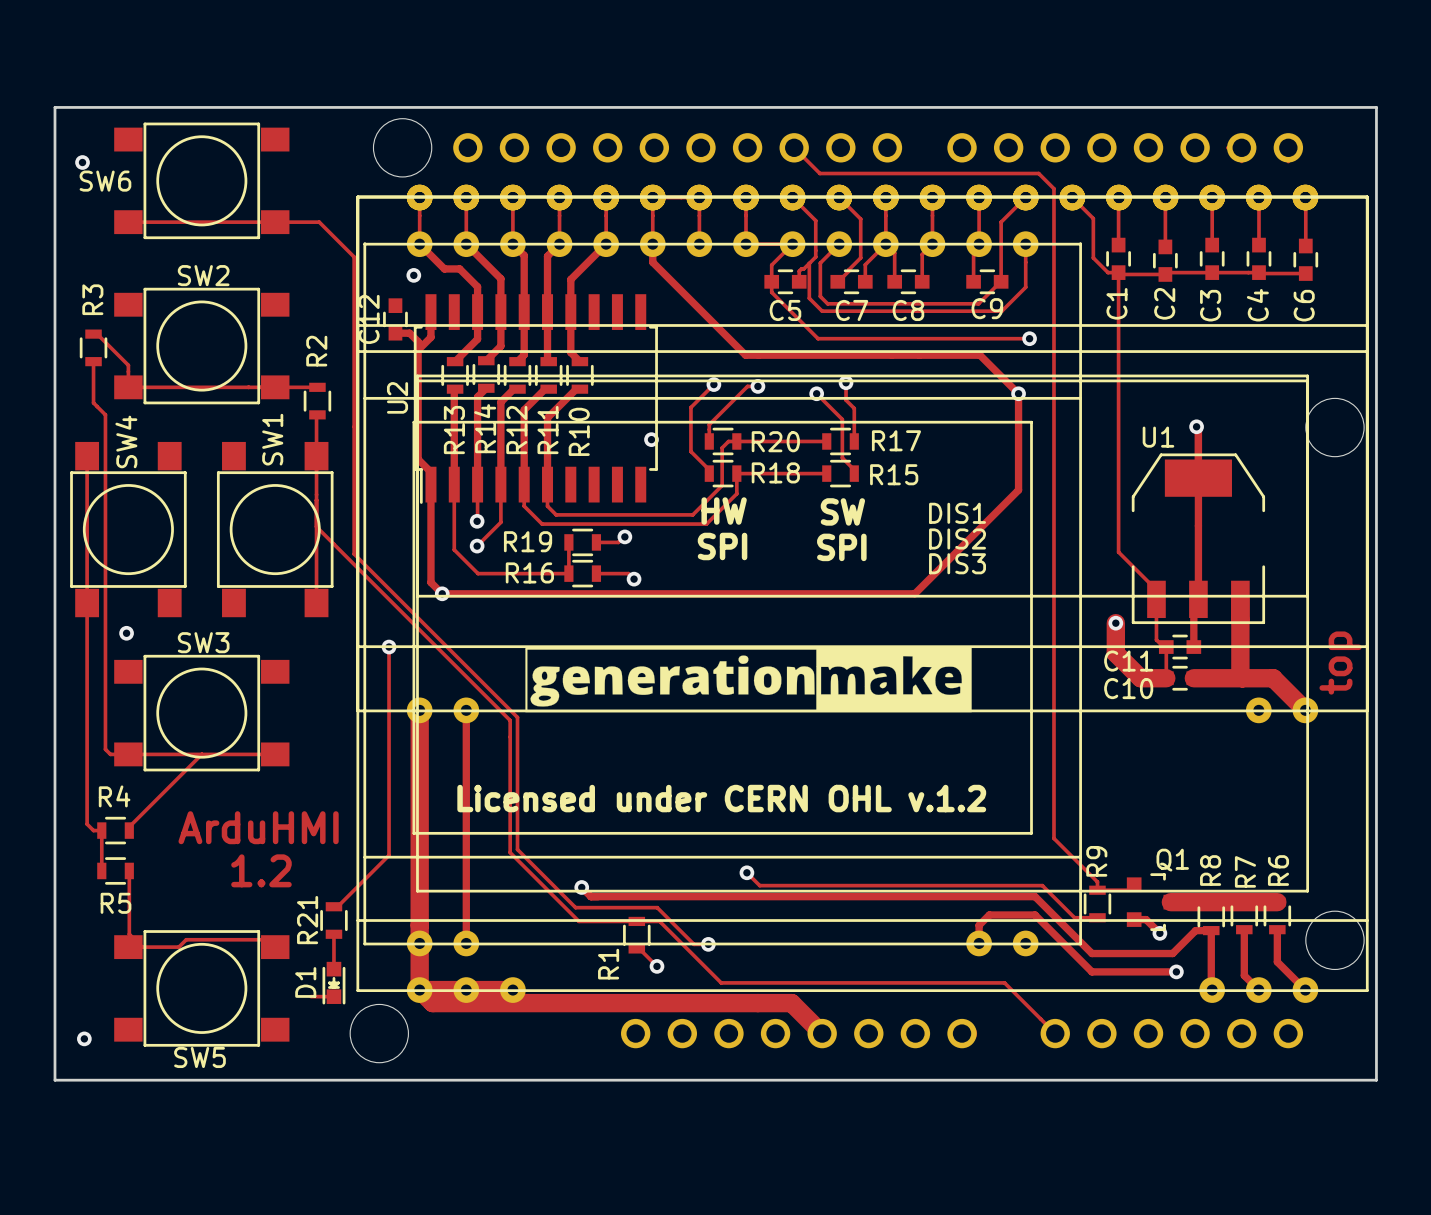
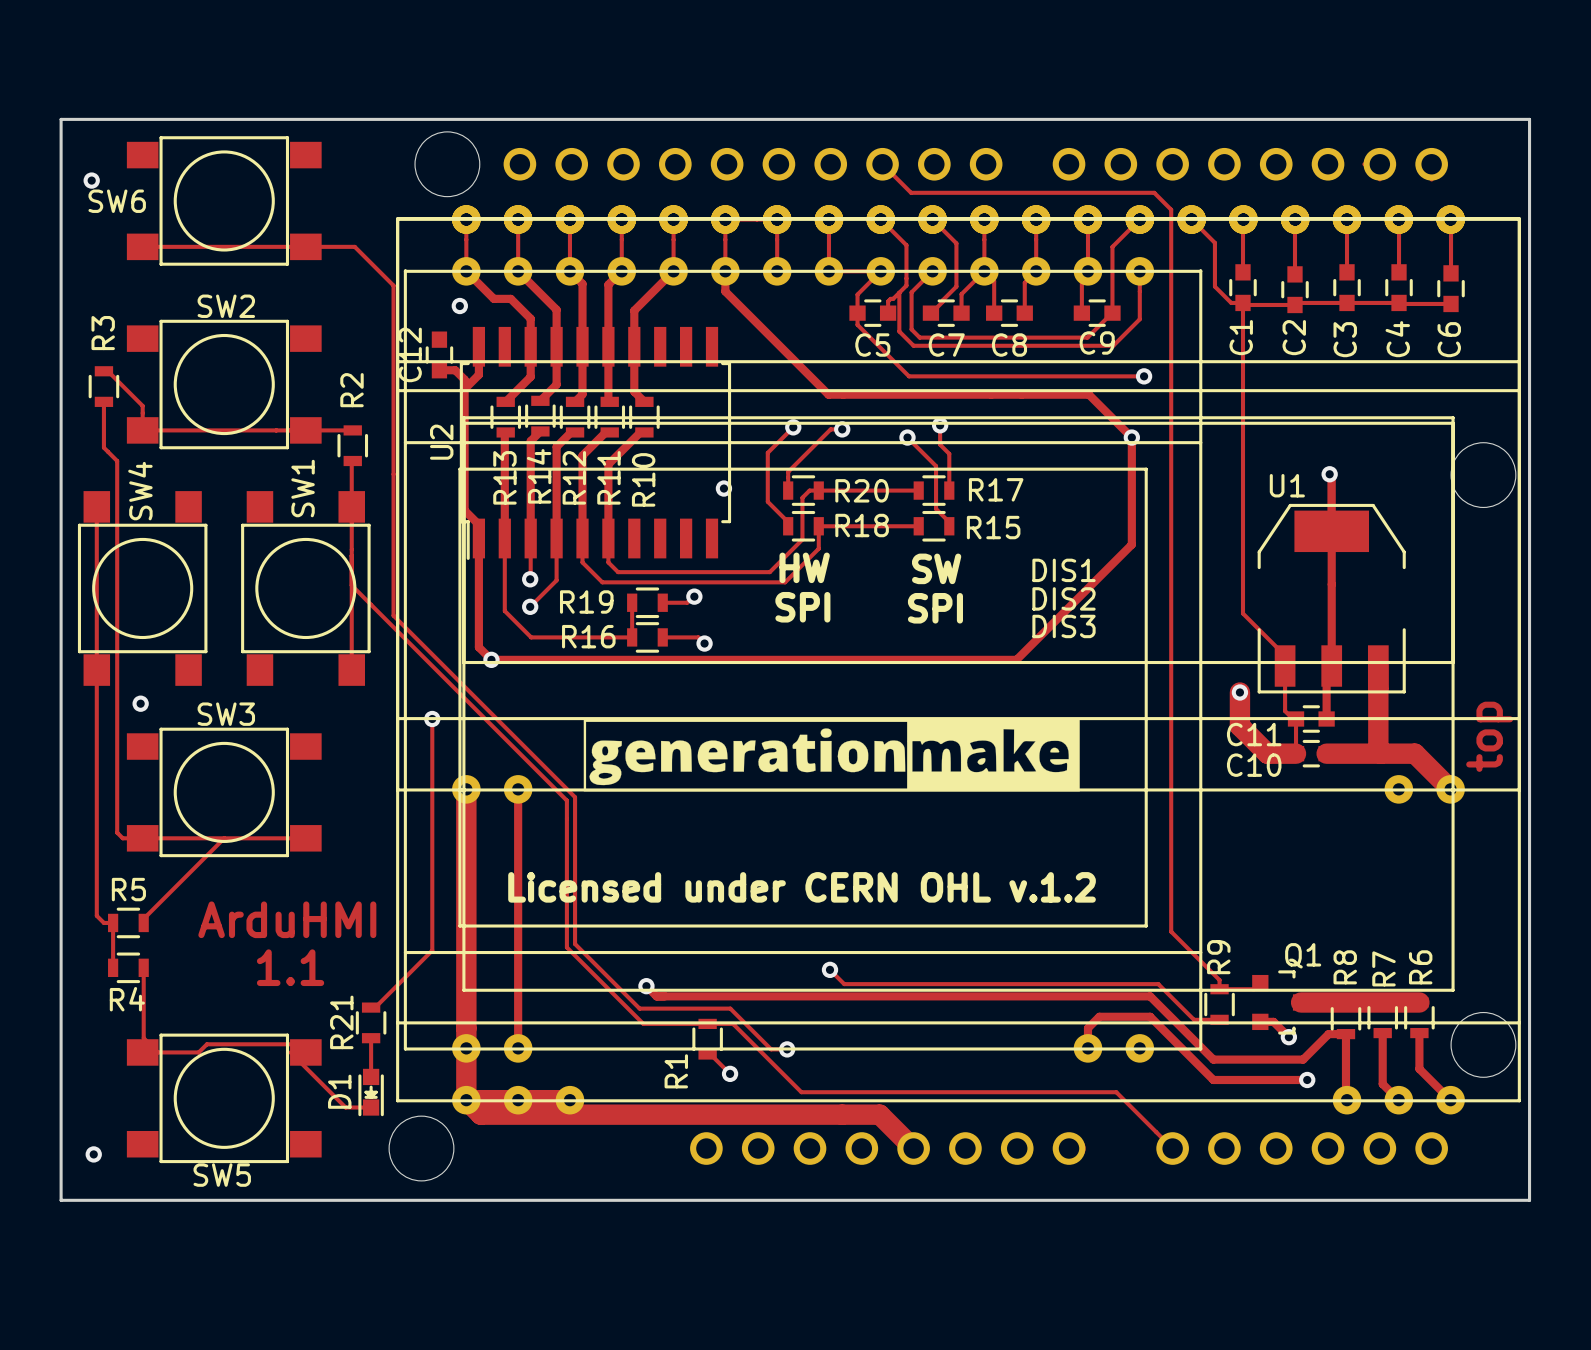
R4 name position: R4 (114, 796) -> R4 (127, 999)
text: 1.2 (261, 870) -> 1.1 (290, 967)
R5 name position: R5 (115, 903) -> R5 (128, 889)
track: none -> (290, 1052) (345, 1107)

